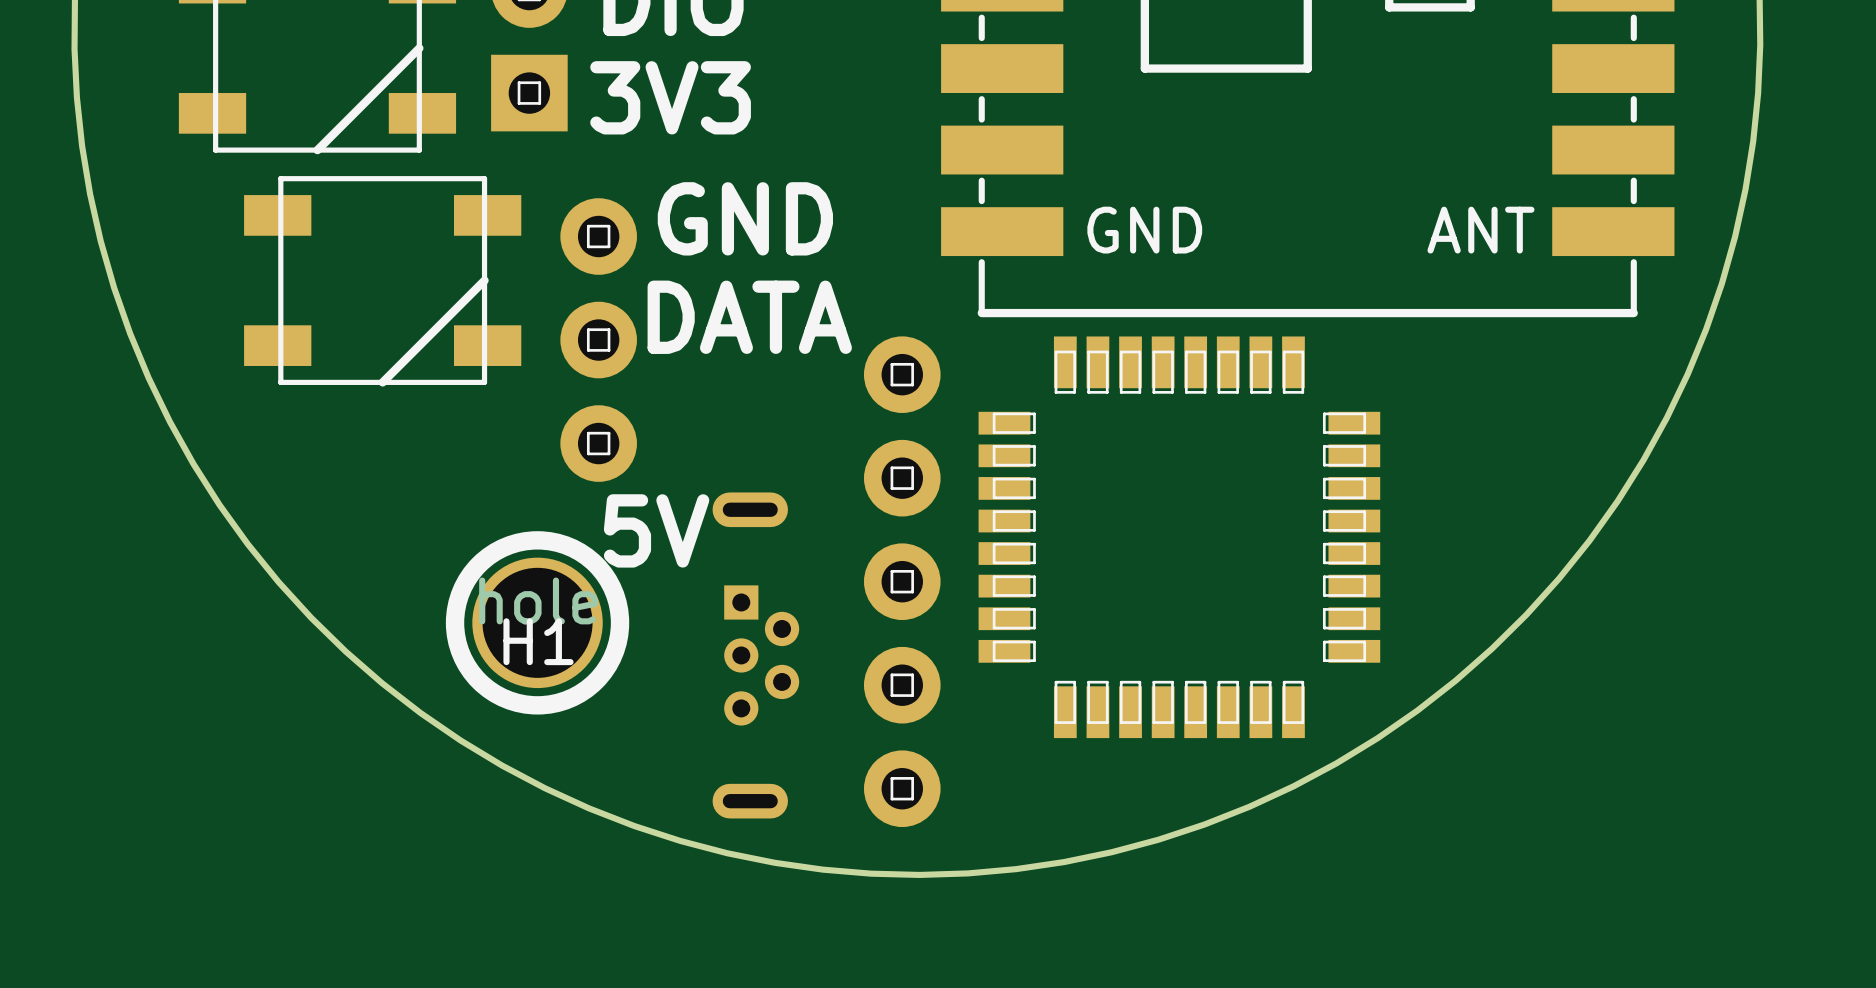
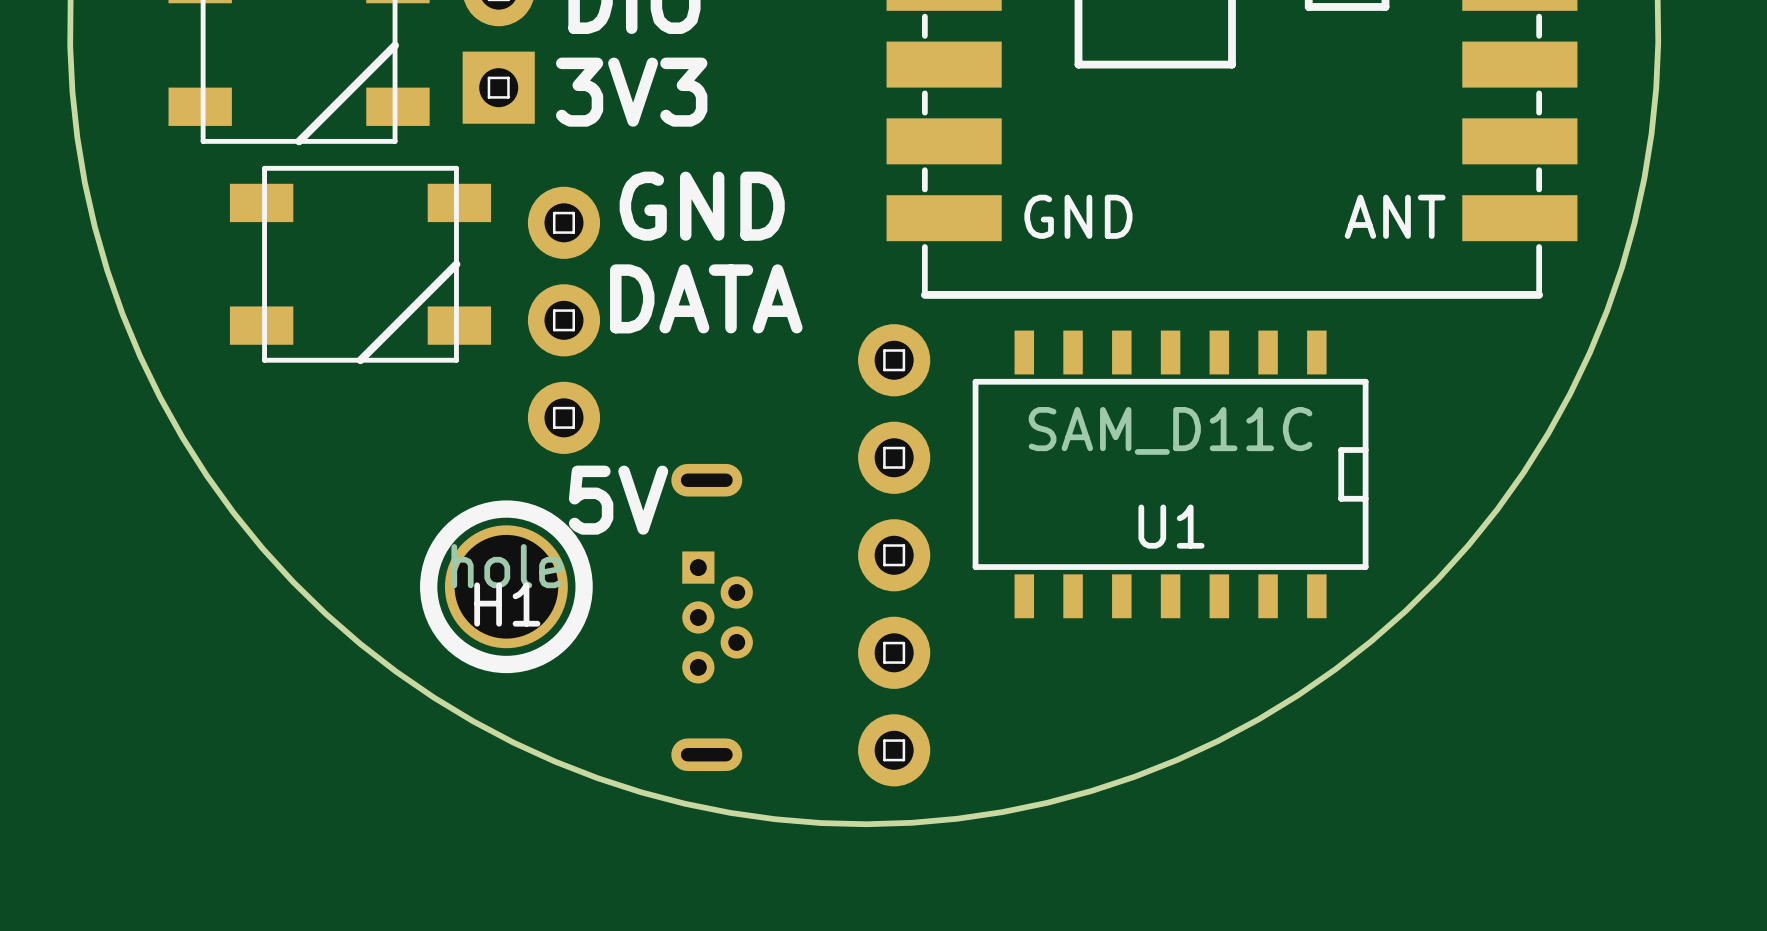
U1: none -> SAM_D11C (1170, 474)
part: (1179, 537) -> none
part position: (902, 581) -> (894, 555)

